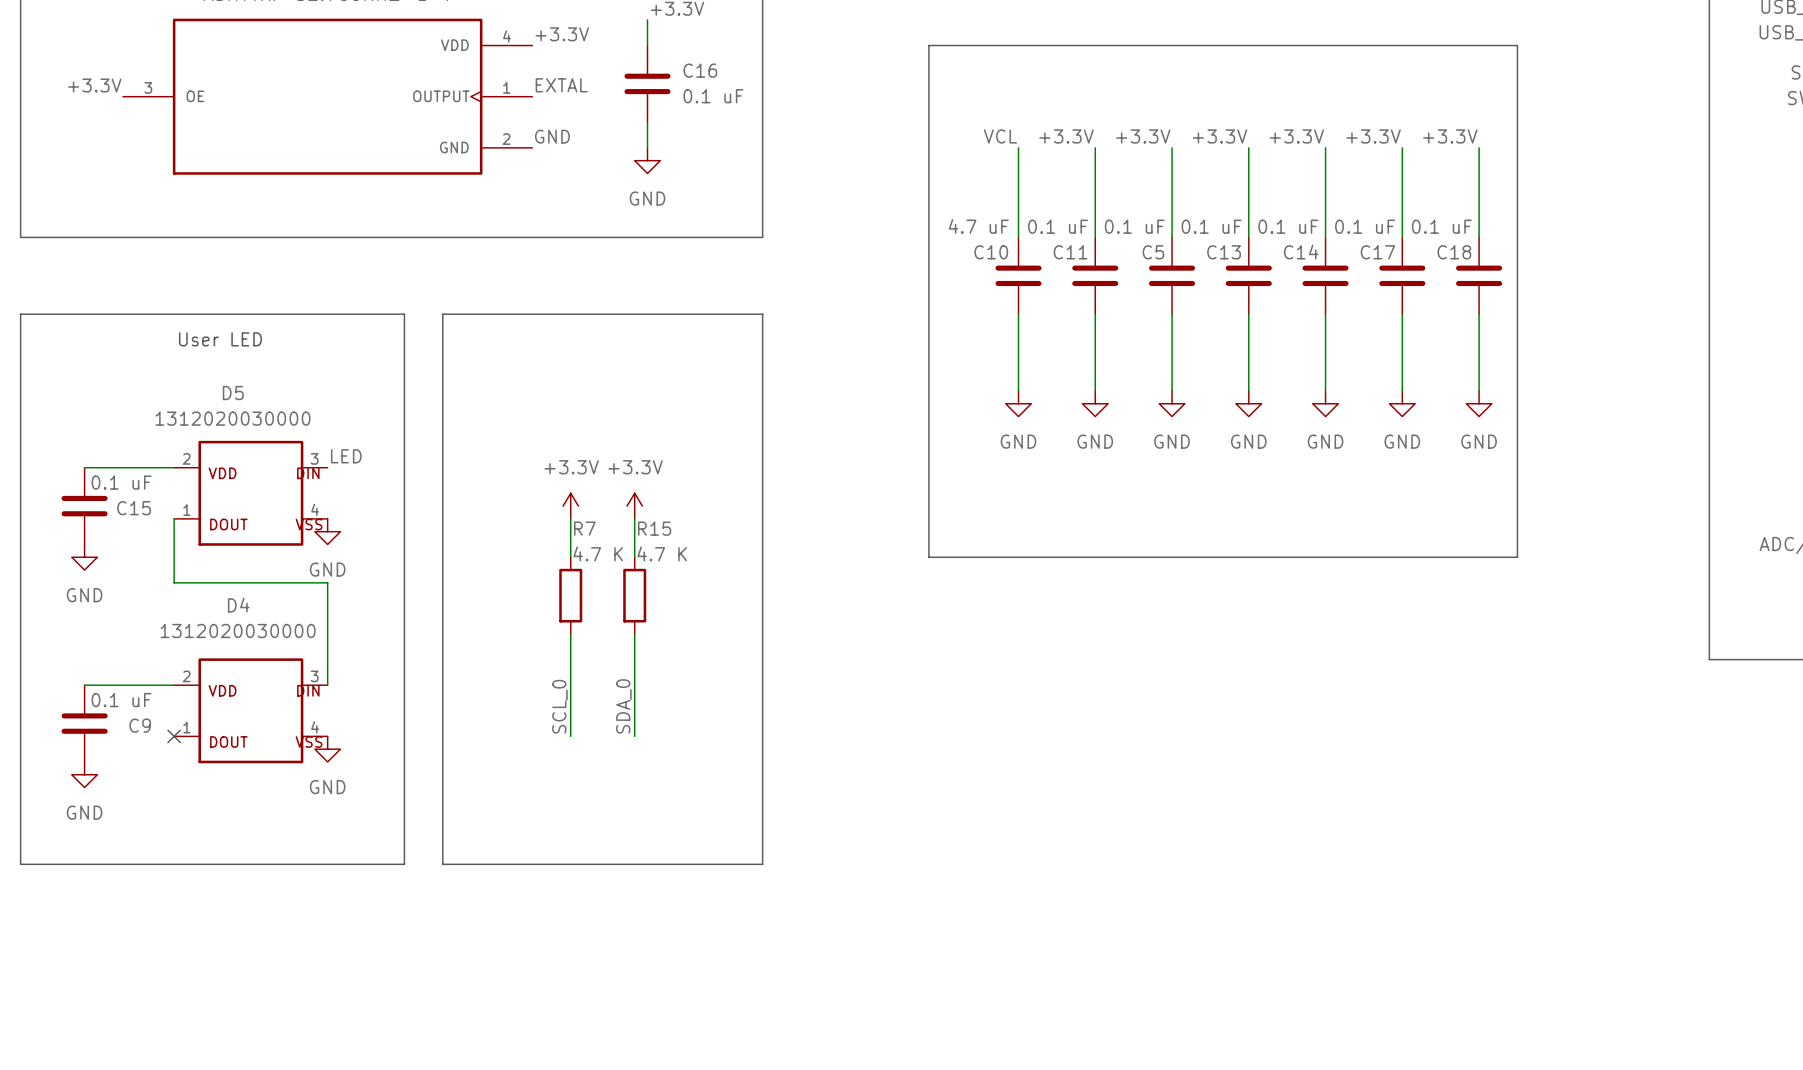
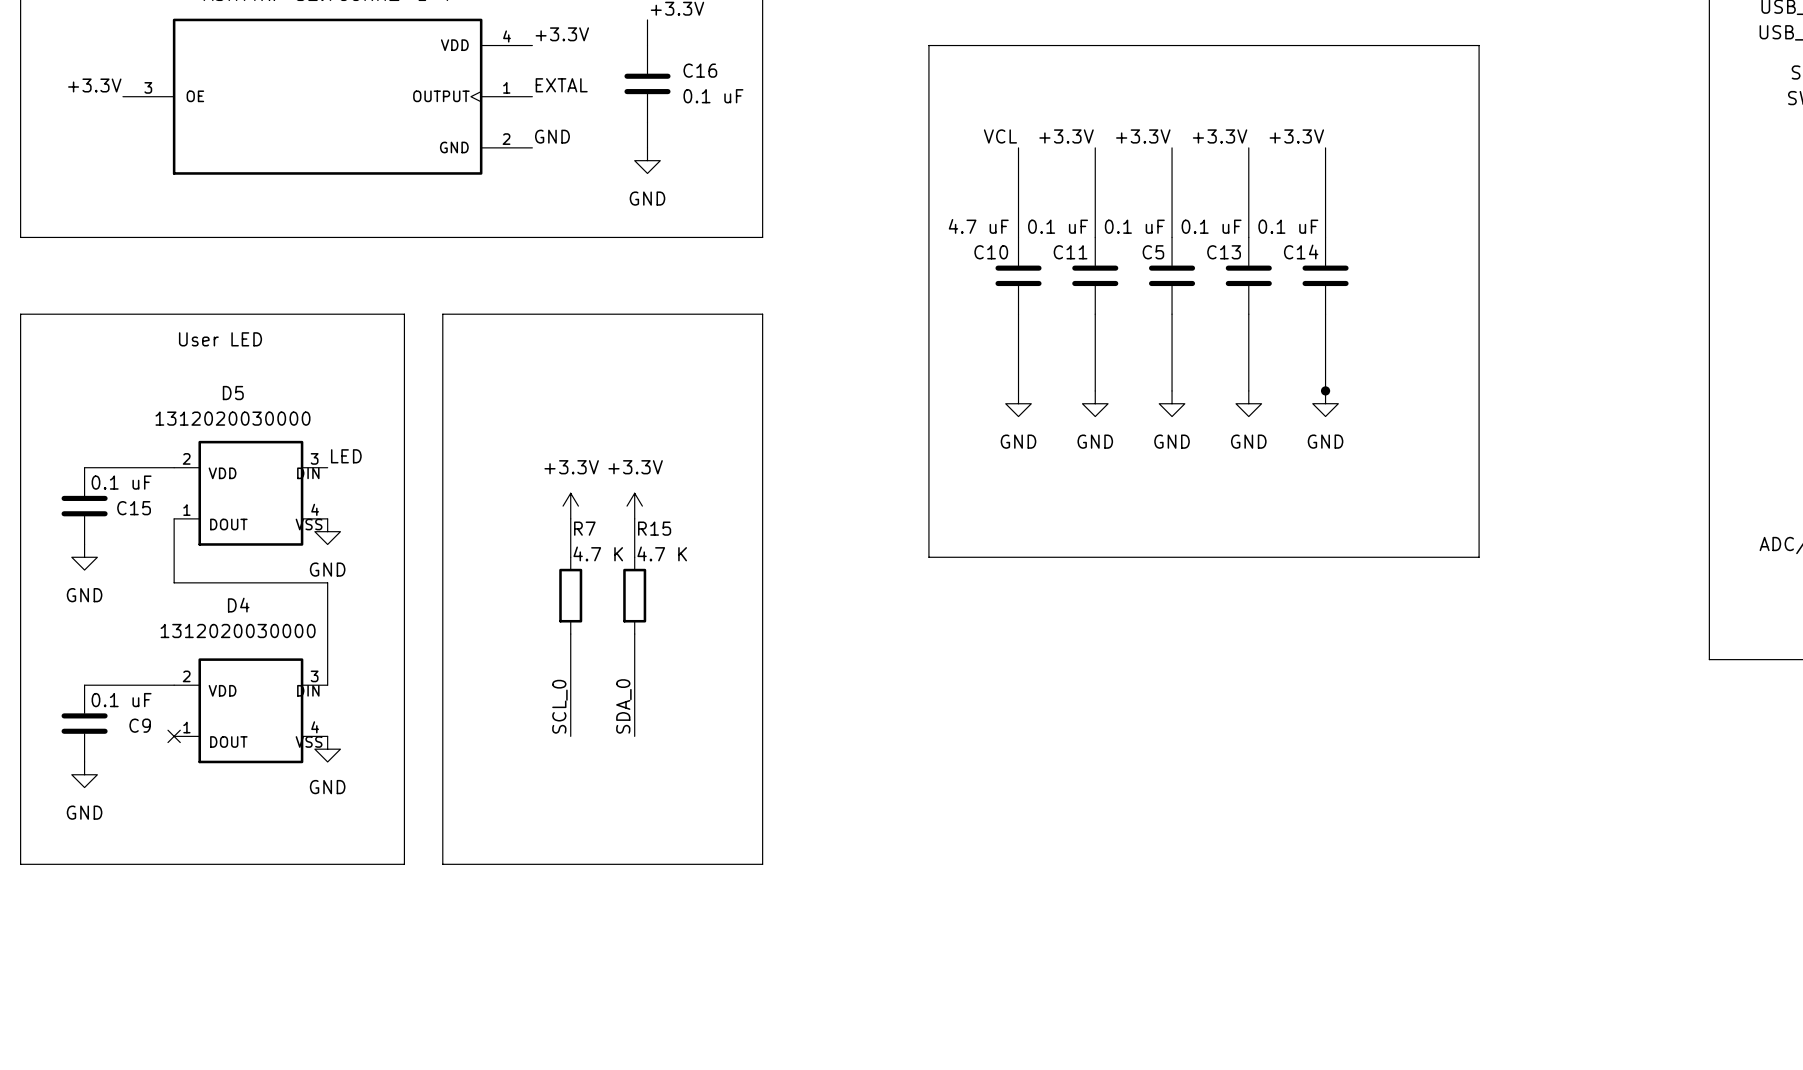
line: (1479, 45) (1517, 45) (1517, 557) (1479, 557) -> (1479, 45) (1479, 557)
label: +3.3V (1373, 136) -> none
label: +3.3V (1450, 136) -> none
wire: (1402, 147) (1402, 237) -> none
C17: 0.1 uF (1402, 275) -> none
C18: 0.1 uF (1479, 275) -> none
wire: (1402, 314) (1402, 390) -> none
junction: none -> (1325, 390)
power symbol: GND (1402, 403) -> none
power symbol: GND (1479, 403) -> none

